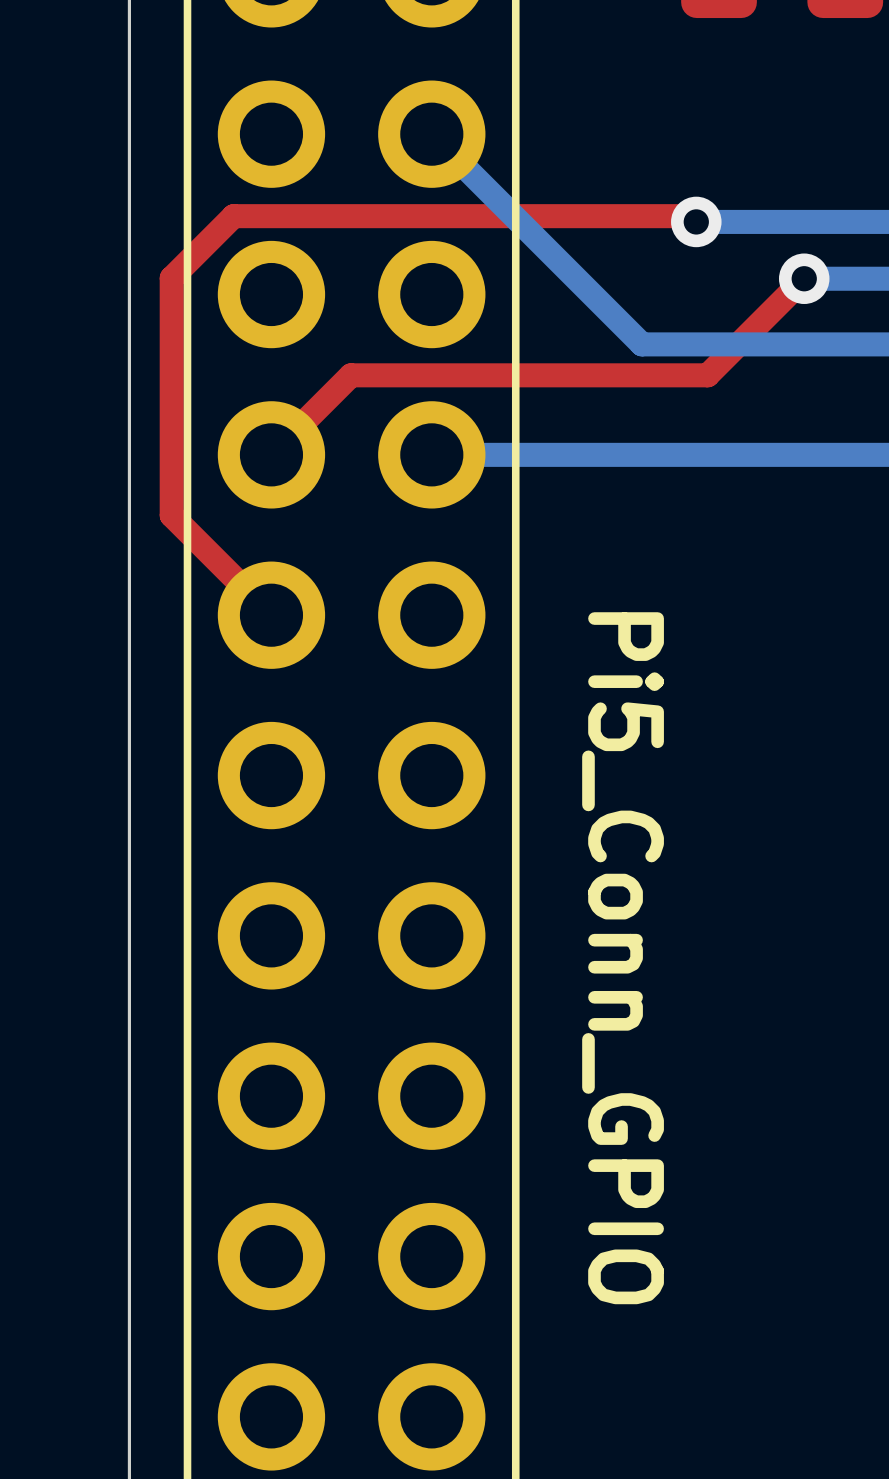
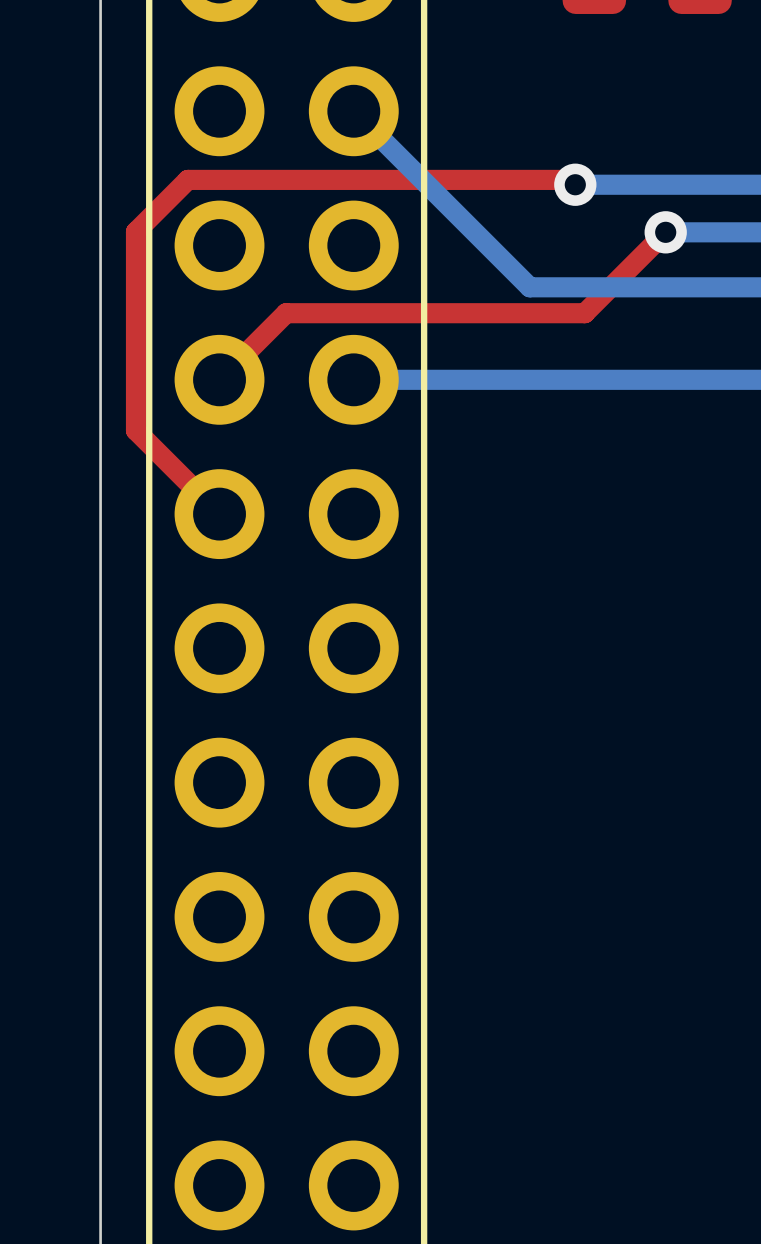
part value: Pi5_Conn_GPIO (623, 958) -> none

